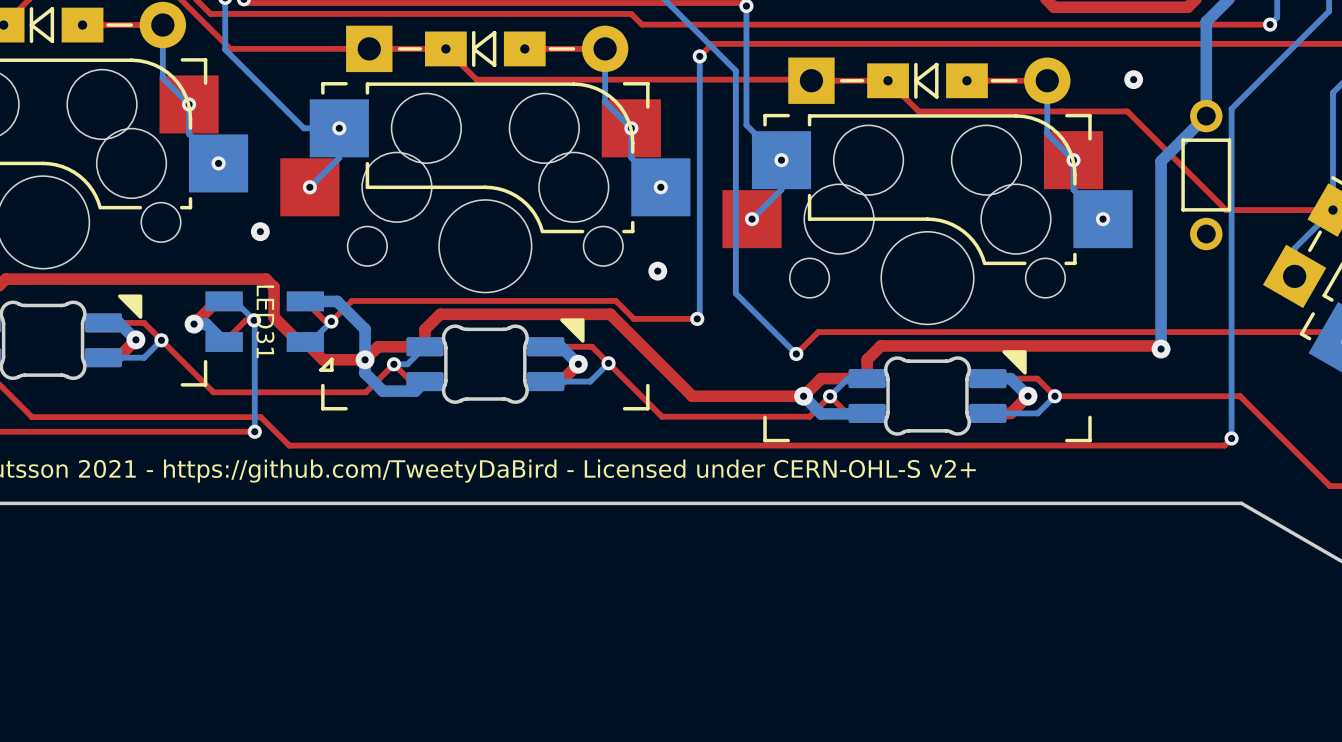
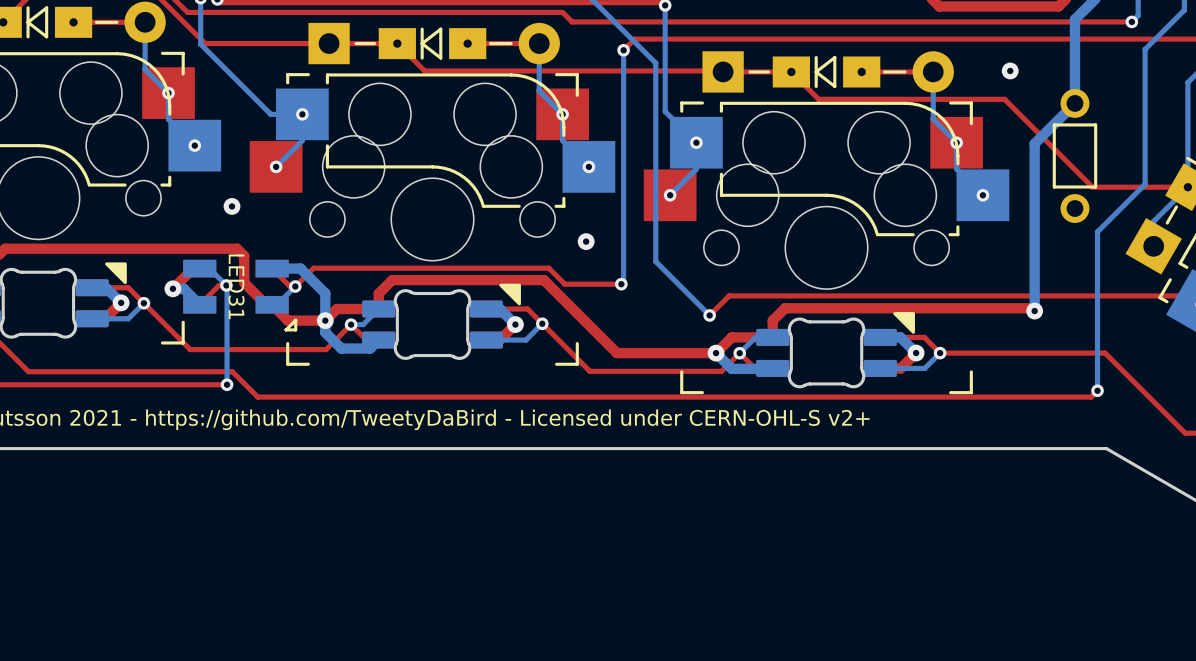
bottom track: (1284, 55) (1231, 108) (1231, 260) -> (1145, 49) (1145, 184) (1097, 231)

